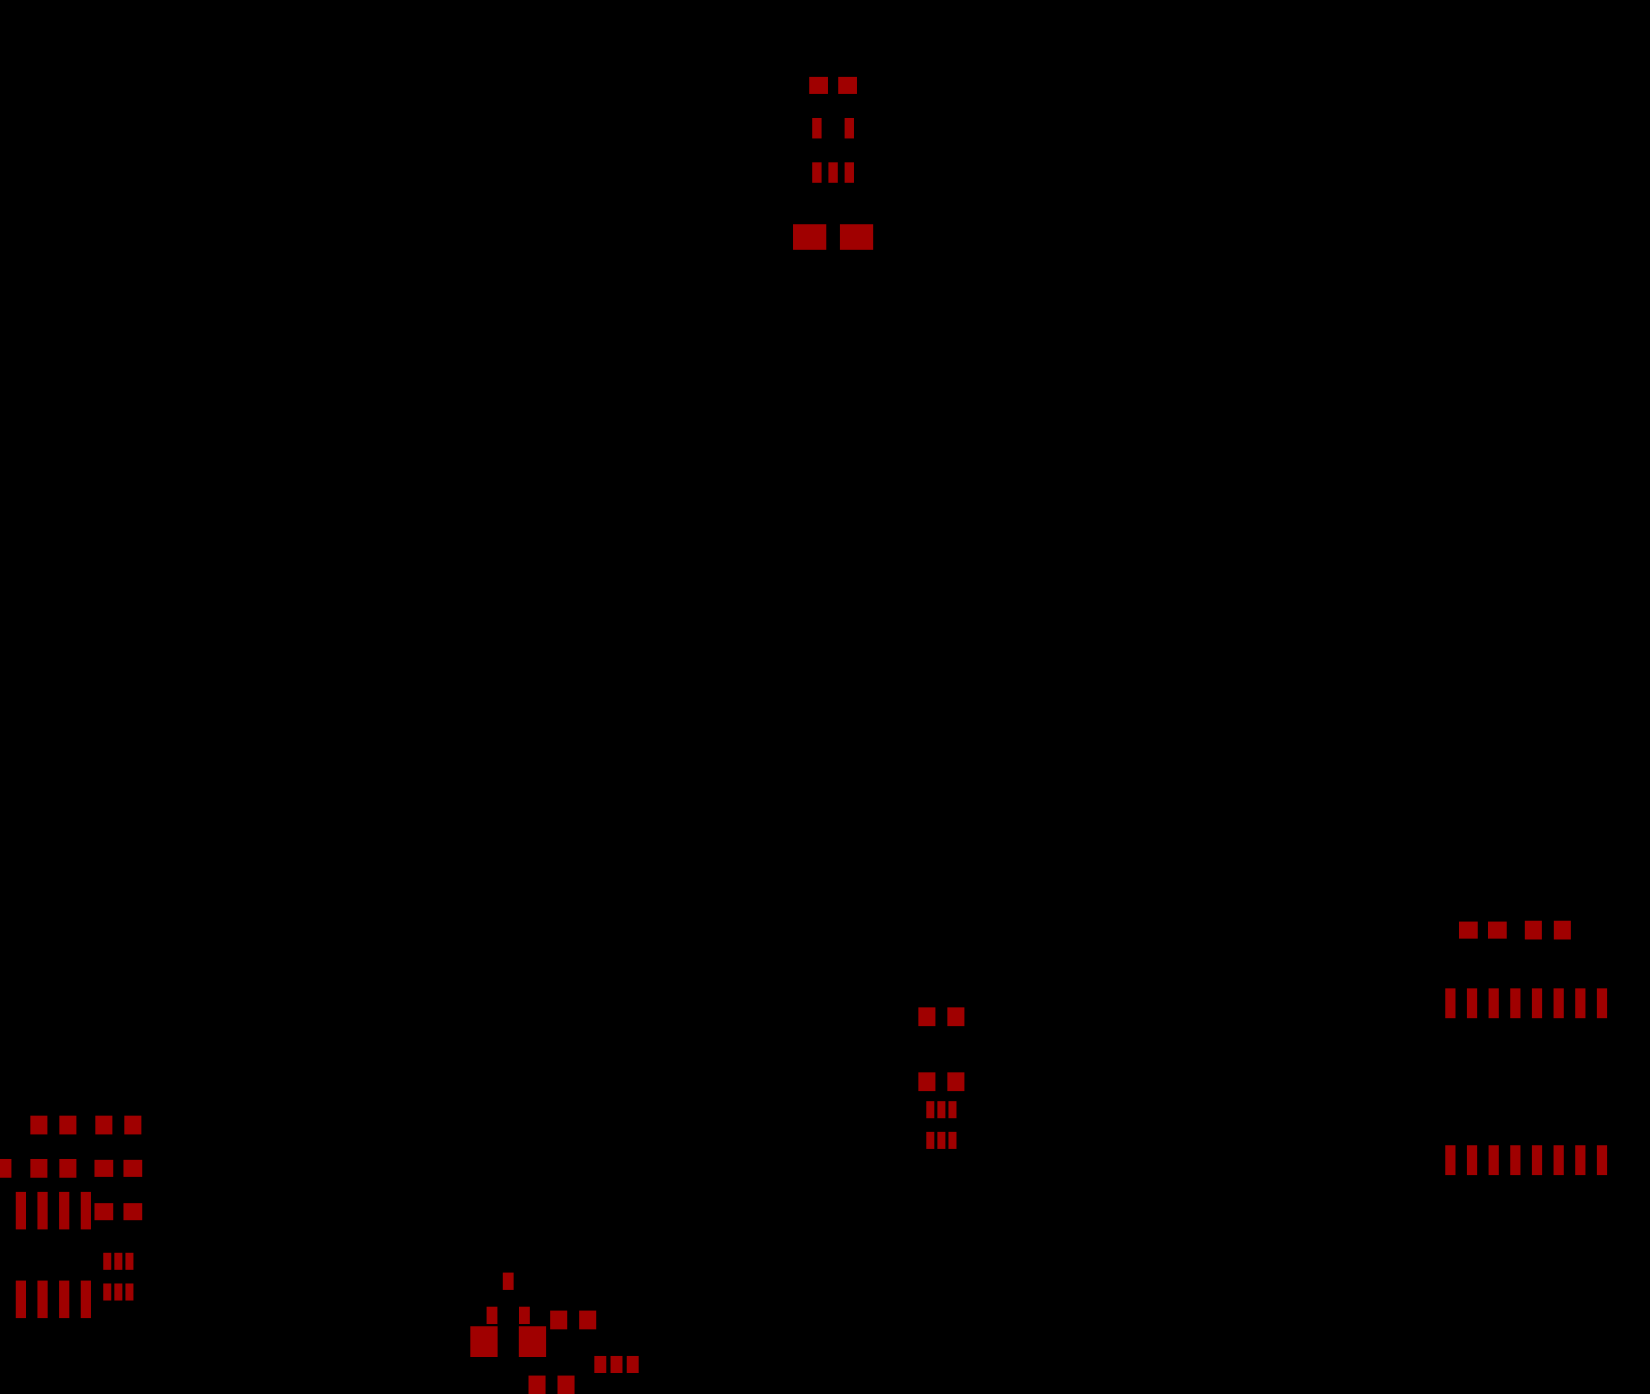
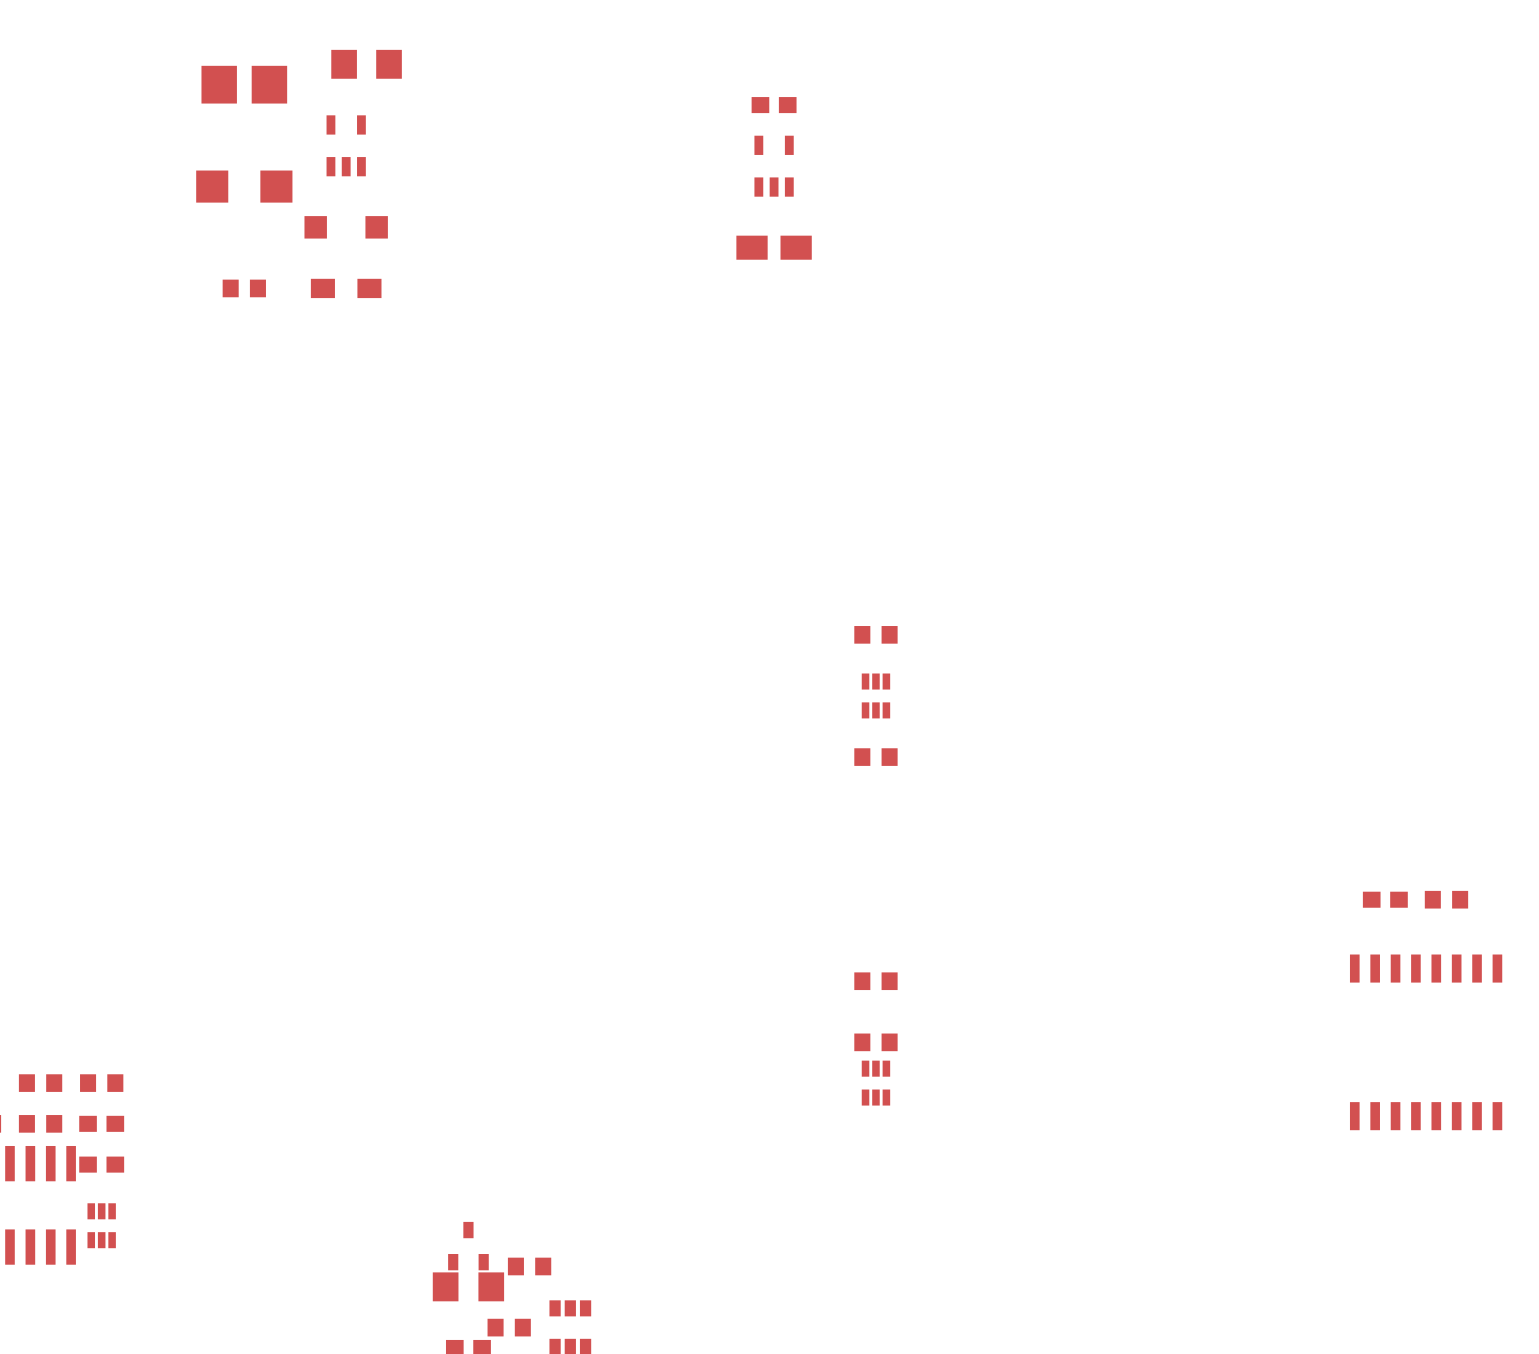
part: none -> (366, 64)
part: none -> (244, 84)
part: none -> (346, 145)
part: none -> (244, 186)
part: none -> (346, 227)
part: none -> (244, 288)
part: none -> (346, 288)
part: none -> (875, 634)
part: none -> (875, 695)
part: none -> (875, 757)

